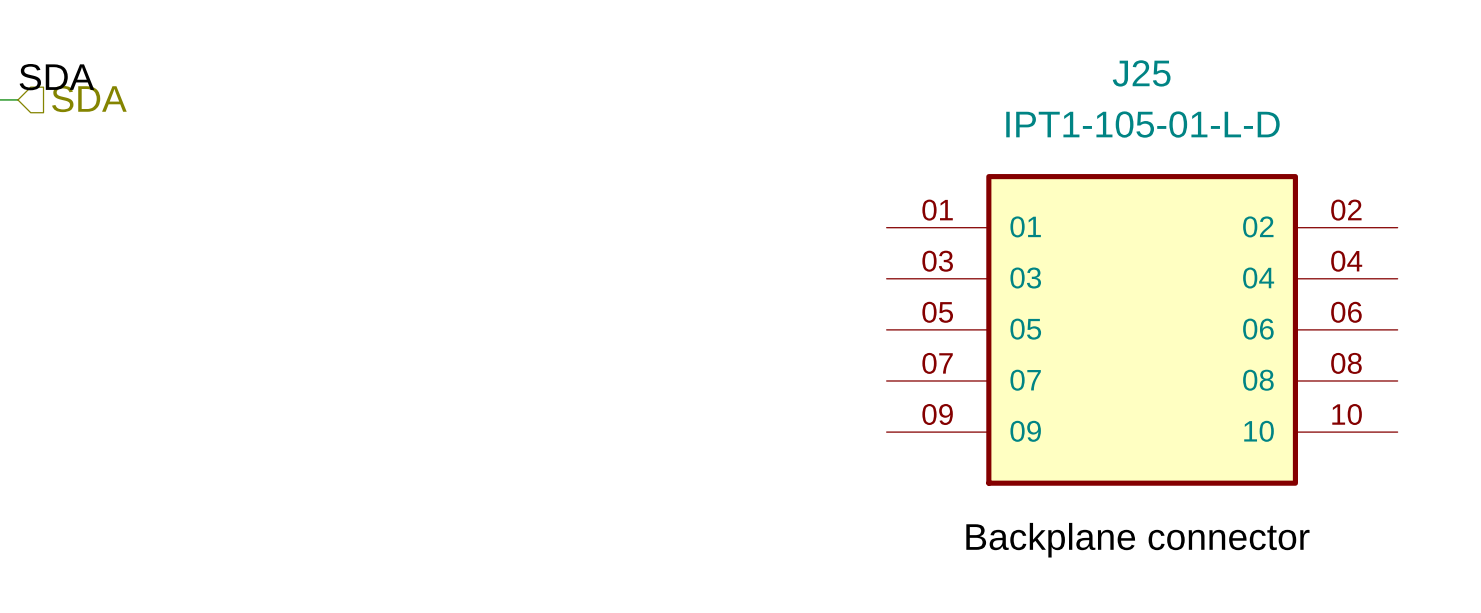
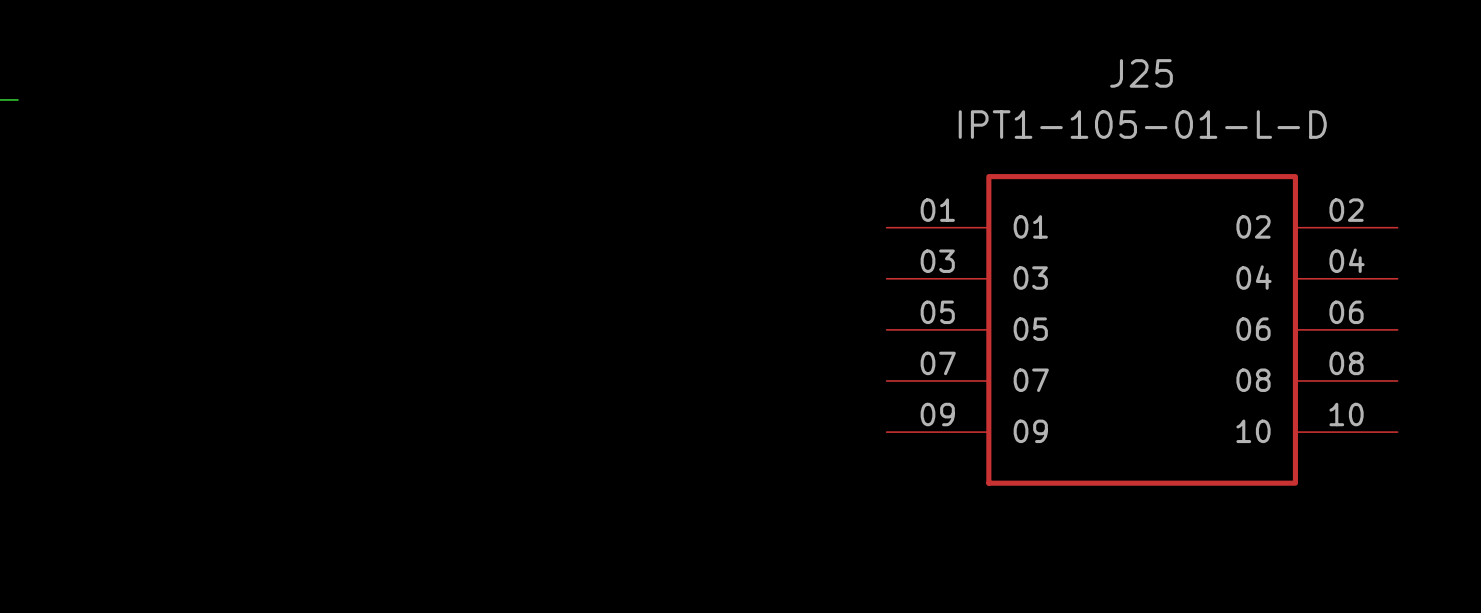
label: SDA (56, 77) -> none
hierarchical label: SDA (89, 98) -> none
label: Backplane connector (1137, 540) -> none

